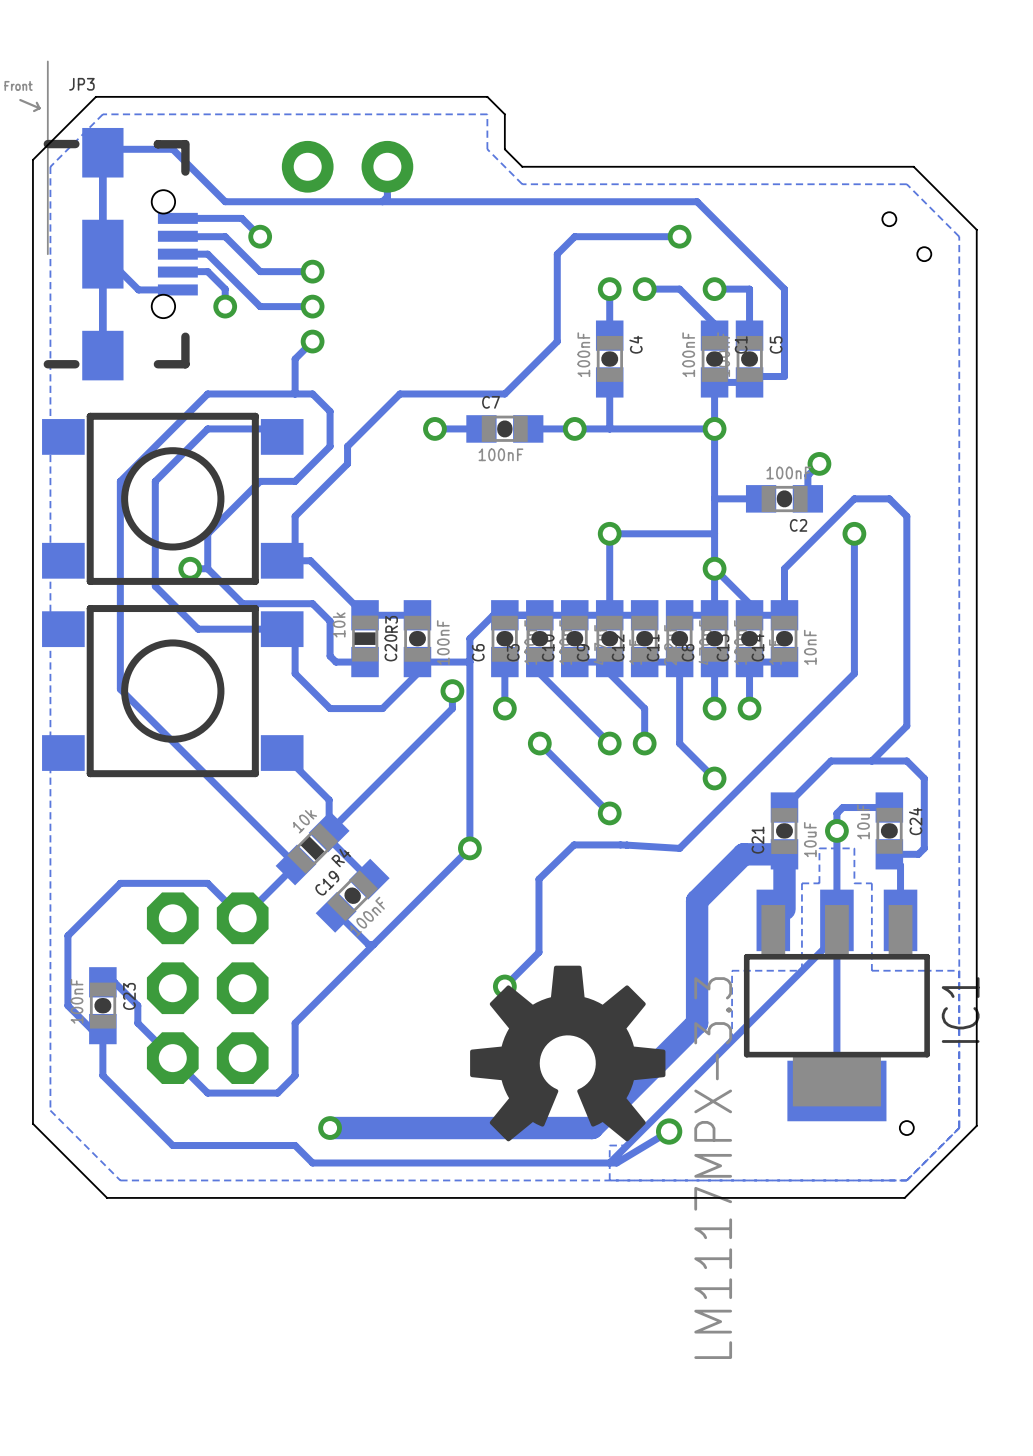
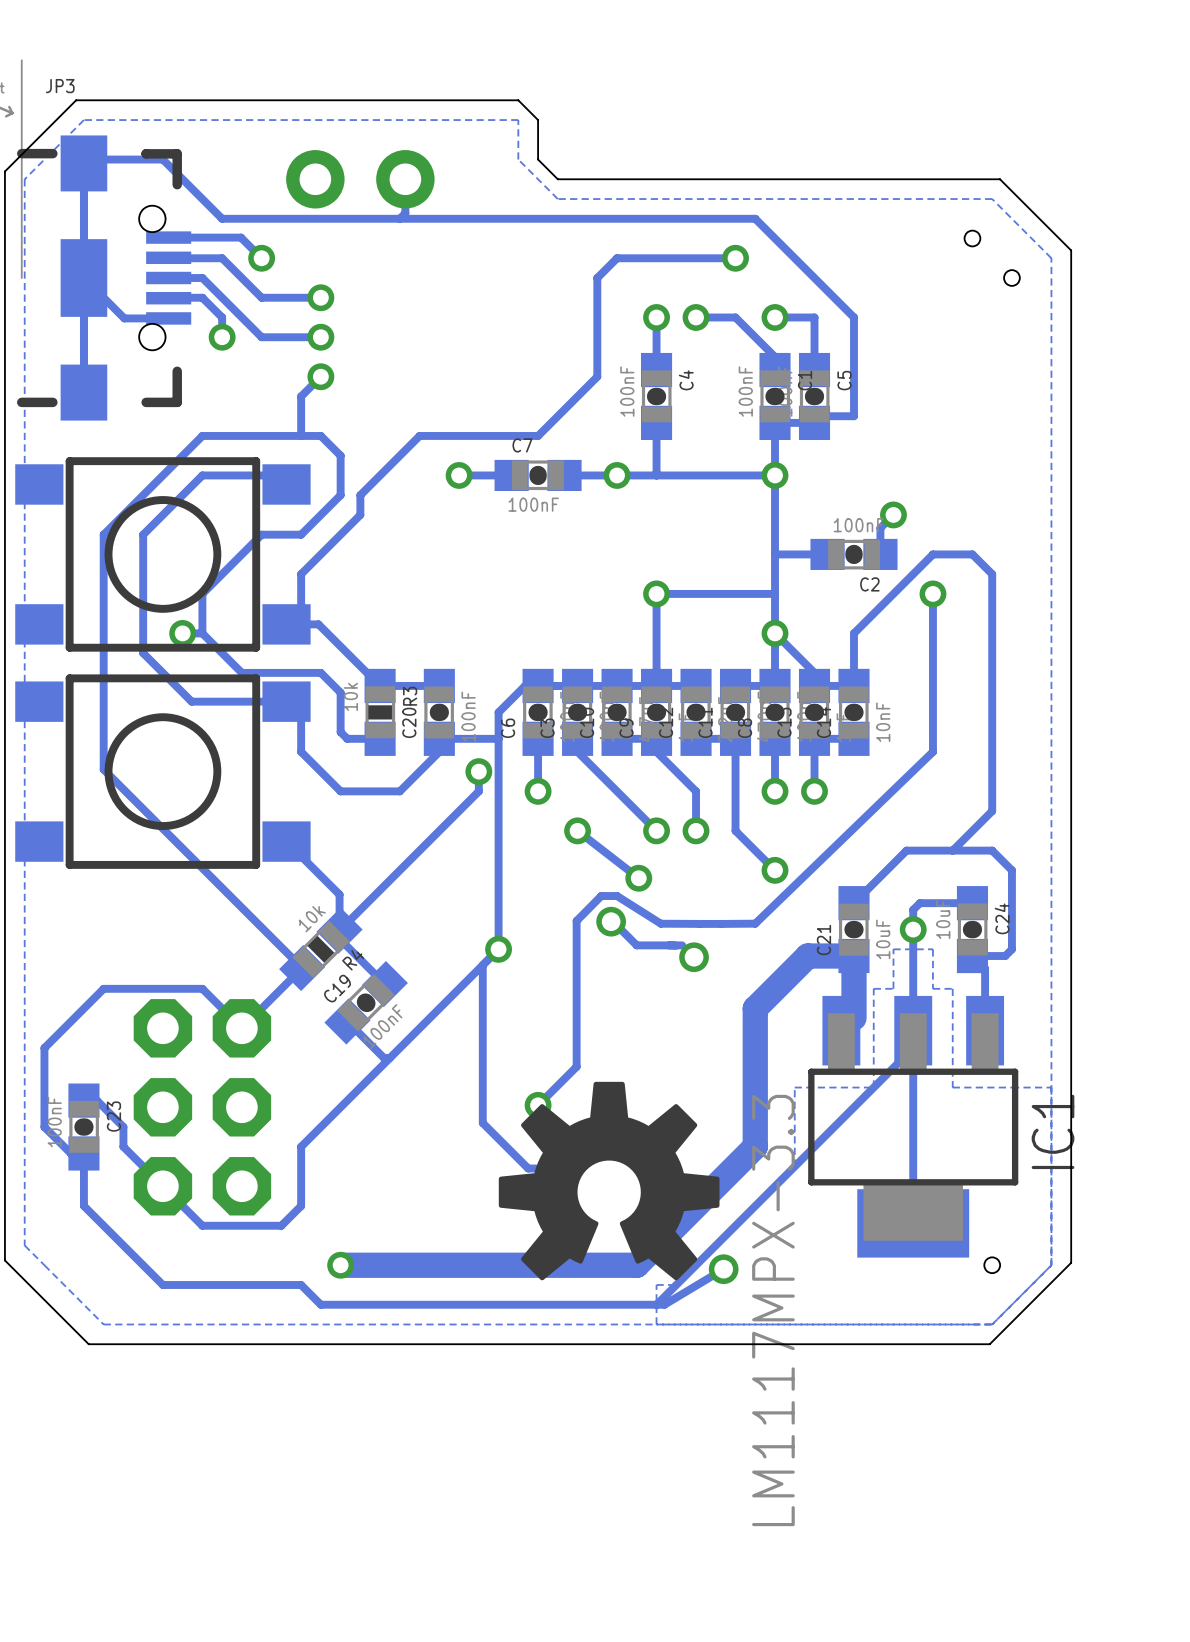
track: (854, 673) (679, 848) (626, 845) -> (932, 751) (755, 923) (660, 923) (617, 896) (601, 896) (576, 920) (576, 984)
track: (539, 743) (609, 813) -> (577, 830) (638, 878)
via position: (609, 813) -> (638, 878)
via: none -> (611, 921)
track: (592, 844) (574, 844) (538, 879) -> (636, 945) (611, 921)
via: none -> (694, 957)
track: none -> (482, 965) (482, 1123) (528, 1168) (536, 1168)

